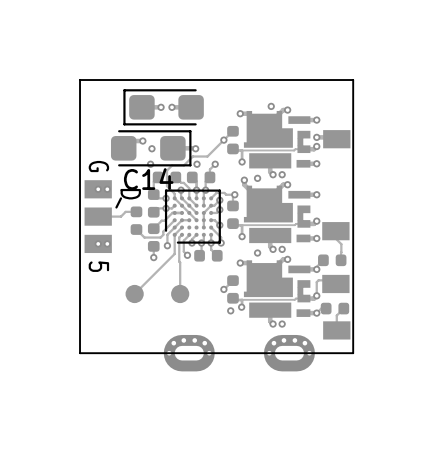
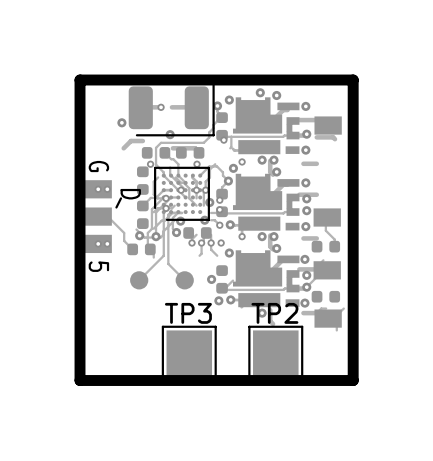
part footprint: [123, 89, 204, 126] -> [128, 79, 215, 137]
via: none -> (260, 92)
via: none -> (276, 95)
via: none -> (229, 100)
track: none -> (217, 105) (217, 111) (222, 117) (213, 125) (213, 128) (209, 132) (209, 137) (203, 142) (161, 142) (156, 147) (156, 164) (163, 172) (163, 175) (185, 197)
via: none -> (217, 105)
via: (271, 106) -> none
via: none -> (305, 106)
via: (171, 107) -> none
part footprint: [243, 110, 311, 169] -> [232, 97, 300, 155]
via: (287, 110) -> none
via: (240, 113) -> none
via: (316, 120) -> none
via: none -> (121, 122)
track: (232, 131) (207, 156) (192, 156) (183, 165) (171, 165) (166, 170) (166, 186) (174, 193) (174, 198) (196, 220) -> none
via: none -> (170, 134)
track: none -> (306, 134) (283, 136) (223, 136) (222, 135)
via: none -> (306, 134)
track: none -> (231, 136) (230, 148)
via: (316, 137) -> none
part position: (336, 139) -> (328, 125)
part position: (232, 140) -> (222, 126)
via: (142, 141) -> none
track: (316, 146) (314, 149) (294, 150) (242, 150) -> none
via: (316, 146) -> none
C14: (151, 148) -> none
via: (151, 148) -> none
via: (195, 148) -> none
track: (242, 150) (242, 161) -> none
via: none -> (305, 150)
part: none -> (156, 152)
track: none -> (164, 152) (178, 164) (178, 175) (185, 182)
part: none -> (190, 152)
via: none -> (262, 160)
via: none -> (273, 160)
via: (316, 163) -> none
via: (215, 164) -> none
via: none -> (233, 168)
via: none -> (276, 171)
via: (273, 174) -> none
via: (282, 174) -> none
track: none -> (200, 175) (209, 166) (217, 166) (228, 181) (222, 187) (222, 191)
part: (166, 177) -> none
part: (201, 177) -> none
via: (257, 178) -> none
part: none -> (142, 180)
via: (244, 180) -> none
via: none -> (228, 181)
via: none -> (305, 182)
via: (287, 184) -> none
part footprint: [243, 185, 311, 244] -> [232, 173, 300, 231]
track: none -> (171, 190) (163, 190) (156, 197) (150, 197) (142, 205)
track: (181, 190) (181, 197) (196, 212) -> (170, 167) (170, 174) (185, 190)
via: (234, 194) -> none
via: (316, 194) -> none
track: none -> (163, 197) (151, 209) (151, 228) (147, 232) (147, 246) (150, 249)
track: none -> (178, 197) (171, 197) (156, 212) (156, 236)
track: (211, 198) (216, 192) (234, 194) (232, 203) -> none
via: none -> (306, 198)
track: (219, 200) (203, 212) (203, 227) -> none
via: none -> (209, 202)
part: (153, 203) -> none
track: none -> (171, 204) (163, 212) (163, 255) (139, 280)
via: none -> (306, 210)
track: (136, 211) (125, 211) (120, 216) (107, 216) -> (132, 249) (124, 240) (124, 232) (107, 216)
track: none -> (222, 211) (223, 213) (292, 212)
track: none -> (171, 212) (168, 214) (168, 263) (184, 280)
part: none -> (142, 214)
part position: (232, 214) -> (222, 202)
part position: (192, 216) -> (181, 193)
part: (136, 220) -> none
track: (189, 220) (181, 220) (167, 234) (167, 245) -> none
via: none -> (204, 220)
via: none -> (180, 221)
track: (316, 221) (314, 223) (294, 225) (242, 225) -> none
via: (316, 221) -> none
via: none -> (230, 224)
track: none -> (325, 224) (325, 230) (334, 239) (334, 246)
via: none -> (305, 226)
track: (181, 227) (174, 234) (174, 253) (134, 294) -> none
track: (211, 227) (221, 237) (221, 243) -> none
part position: (335, 231) -> (327, 217)
via: none -> (176, 232)
part: none -> (197, 232)
track: (181, 234) (179, 237) (180, 294) -> none
track: (189, 234) (183, 240) (183, 251) (187, 255) -> (178, 212) (172, 217) (172, 228) (176, 232)
via: none -> (139, 235)
via: none -> (156, 236)
via: none -> (262, 236)
via: none -> (273, 236)
part: (153, 237) -> none
track: (334, 237) (341, 244) (341, 260) -> none
via: (316, 238) -> none
via: (167, 245) -> none
via: none -> (276, 248)
part: none -> (141, 249)
via: (273, 249) -> none
via: (282, 249) -> none
via: none -> (229, 253)
via: (257, 253) -> none
via: (187, 255) -> none
part: (208, 255) -> none
via: (153, 257) -> none
via: (287, 259) -> none
via: none -> (304, 259)
part footprint: [243, 260, 311, 318] -> [232, 250, 300, 308]
part position: (332, 260) -> (325, 246)
via: (240, 263) -> none
via: (316, 269) -> none
track: none -> (327, 270) (323, 270) (305, 288) (223, 289) (222, 288)
via: none -> (306, 275)
via: none -> (211, 279)
part: none -> (222, 279)
track: (335, 280) (318, 280) (316, 282) (316, 295) (314, 298) (242, 299) -> none
part position: (335, 283) -> (327, 270)
via: none -> (306, 287)
via: (223, 289) -> none
part: (232, 289) -> none
part position: (134, 294) -> (139, 280)
part position: (180, 294) -> (184, 280)
via: (316, 295) -> none
via: none -> (230, 299)
via: none -> (218, 300)
via: none -> (304, 303)
via: (241, 307) -> none
part position: (334, 308) -> (325, 296)
via: (230, 310) -> none
via: none -> (262, 313)
via: (316, 313) -> none
via: (273, 324) -> none
via: (282, 324) -> none
part position: (336, 330) -> (328, 318)
board edge: (80, 353) (353, 353) -> (80, 353) (80, 380) (353, 380) (353, 353)
board edge width: thin (80, 353) (80, 80) (353, 80) (353, 353) -> thick (80, 353) (80, 80) (353, 80) (353, 353)
part: (189, 353) -> none
TP3: none -> (189, 353)
TP2: none -> (275, 353)
part: (289, 353) -> none

